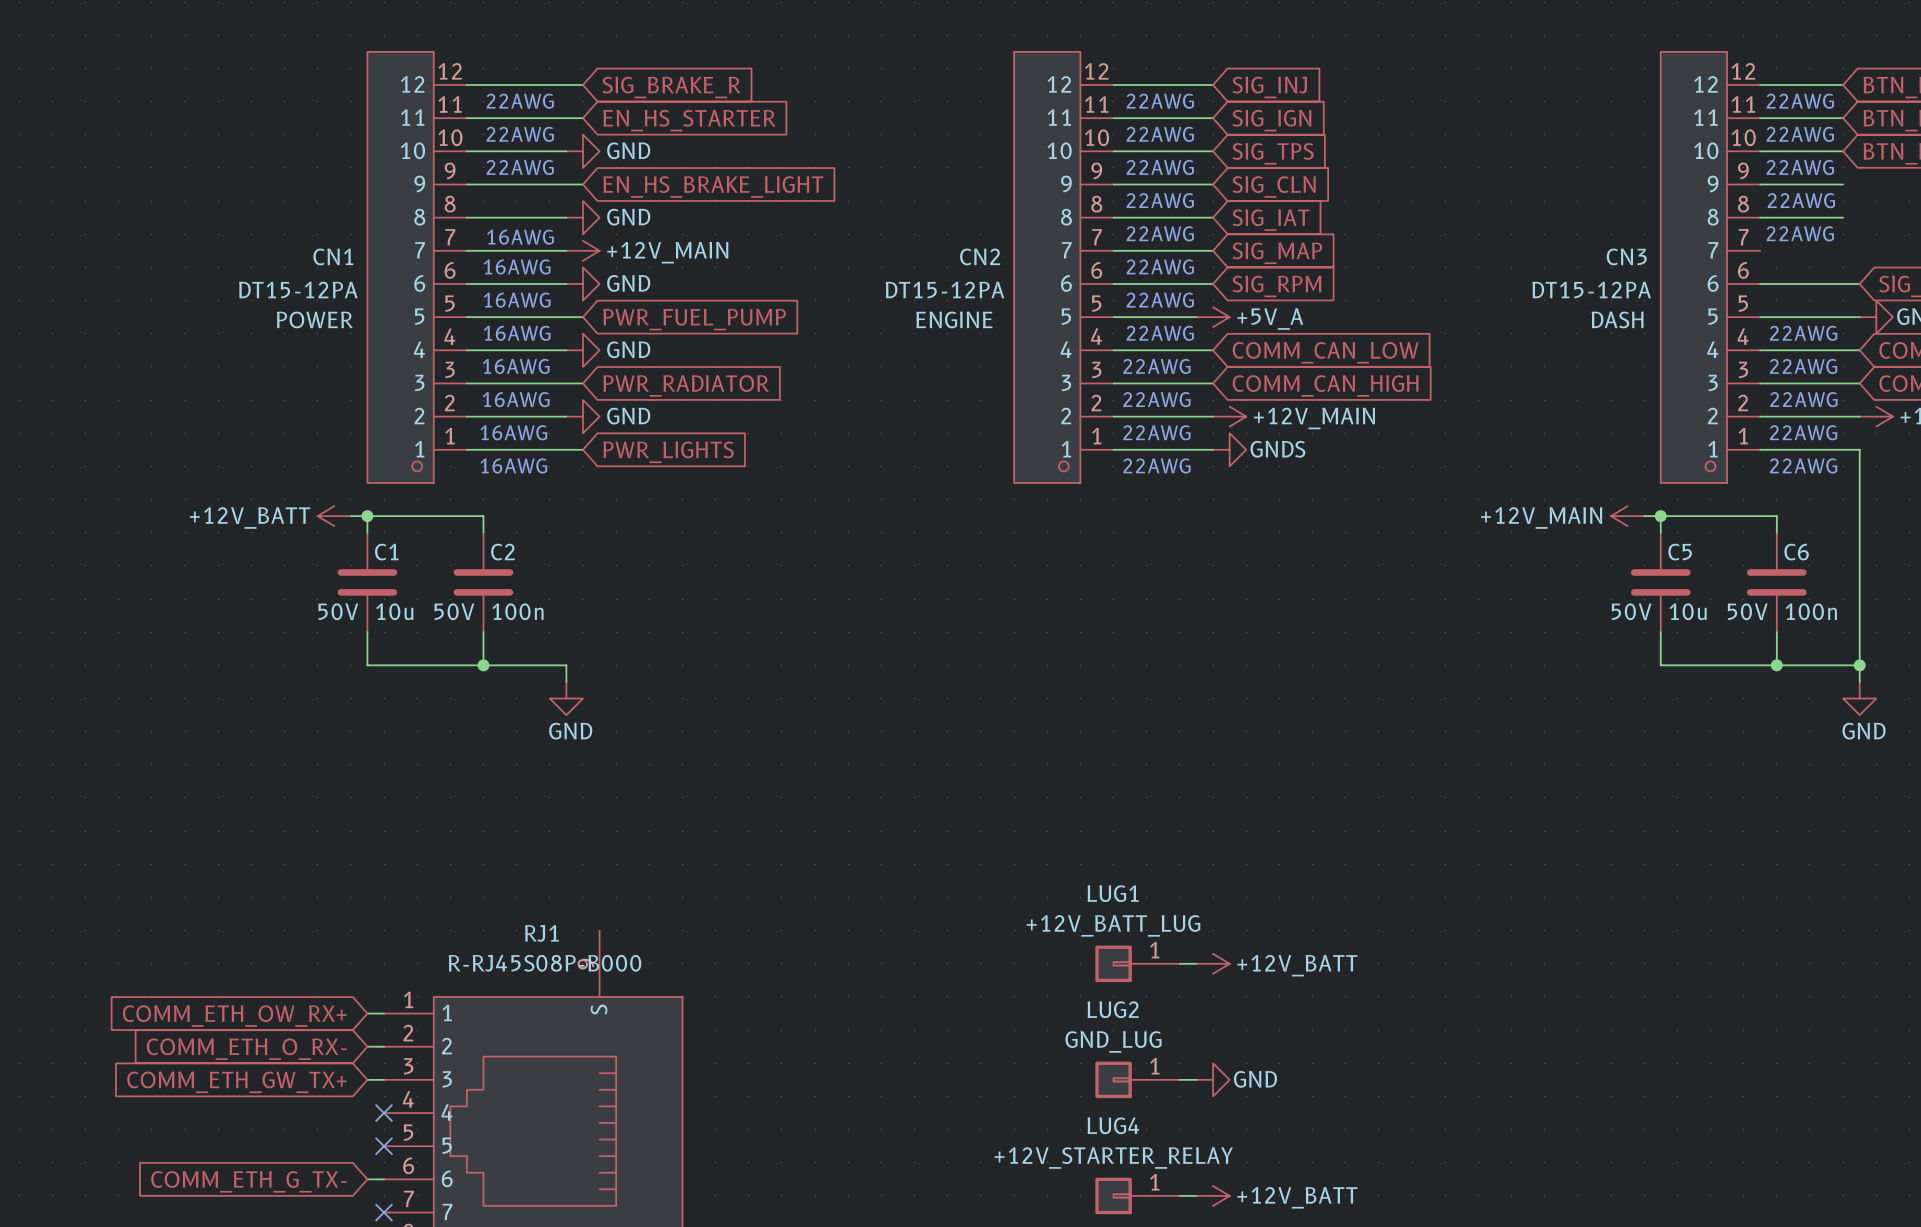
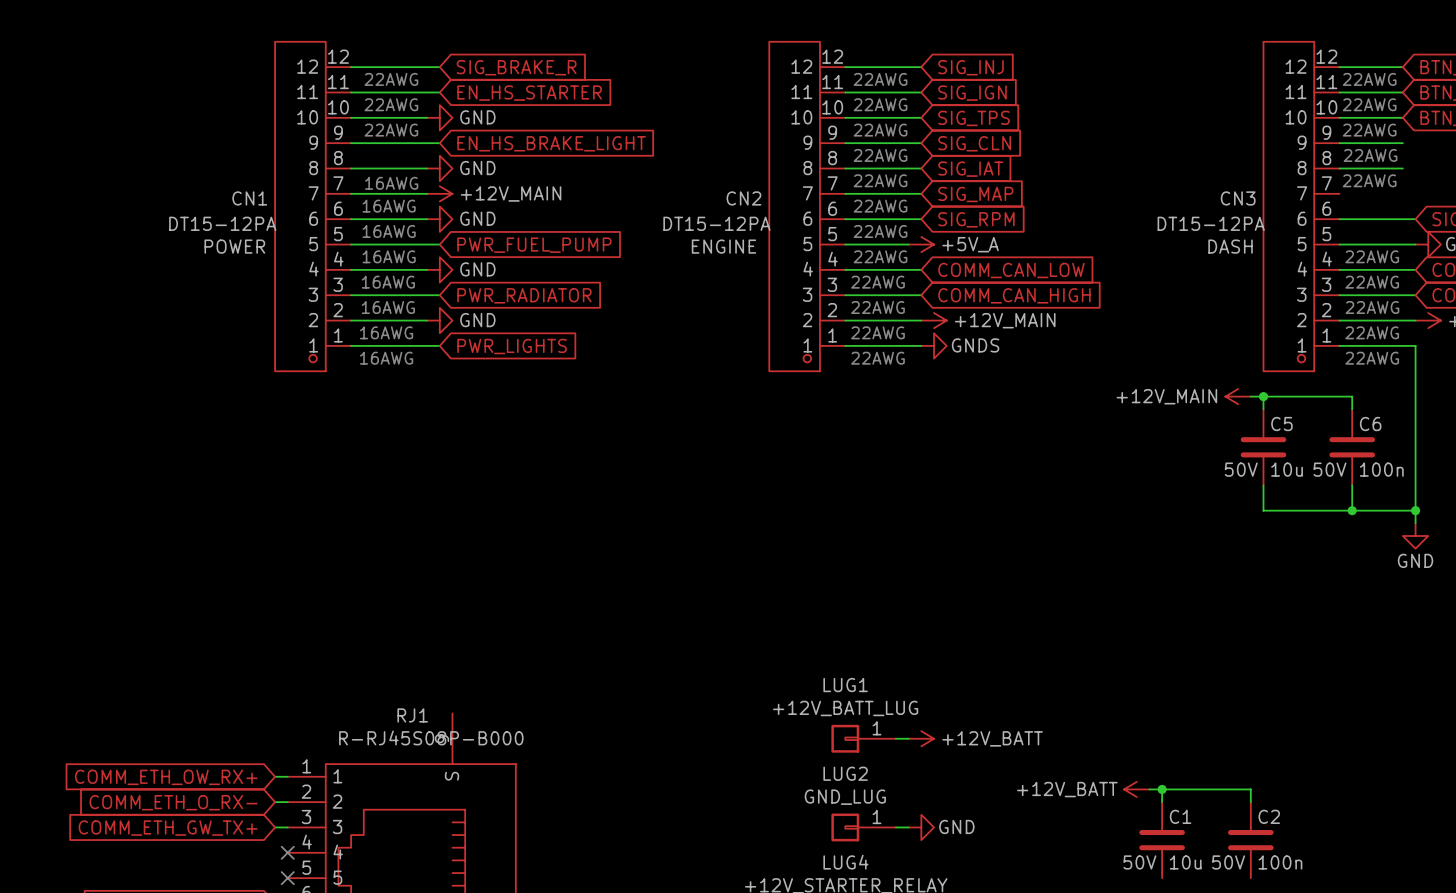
power symbol: +12V_BATT (334, 516) -> none
wire: (350, 516) (483, 516) (483, 532) -> none
wire: (367, 516) (367, 532) -> none
junction: (367, 516) -> none
C1 position: (367, 582) -> (1162, 840)
C2 position: (483, 582) -> (1250, 840)
wire: (367, 632) (367, 665) (566, 665) (566, 681) -> none
wire: (483, 632) (483, 665) -> none
junction: (483, 665) -> none
power symbol: GND (566, 698) -> none
power symbol: none -> +12V_BATT (1136, 789)
wire: none -> (1149, 789) (1250, 789) (1250, 802)
wire: none -> (1162, 789) (1162, 802)
junction: none -> (1162, 789)

